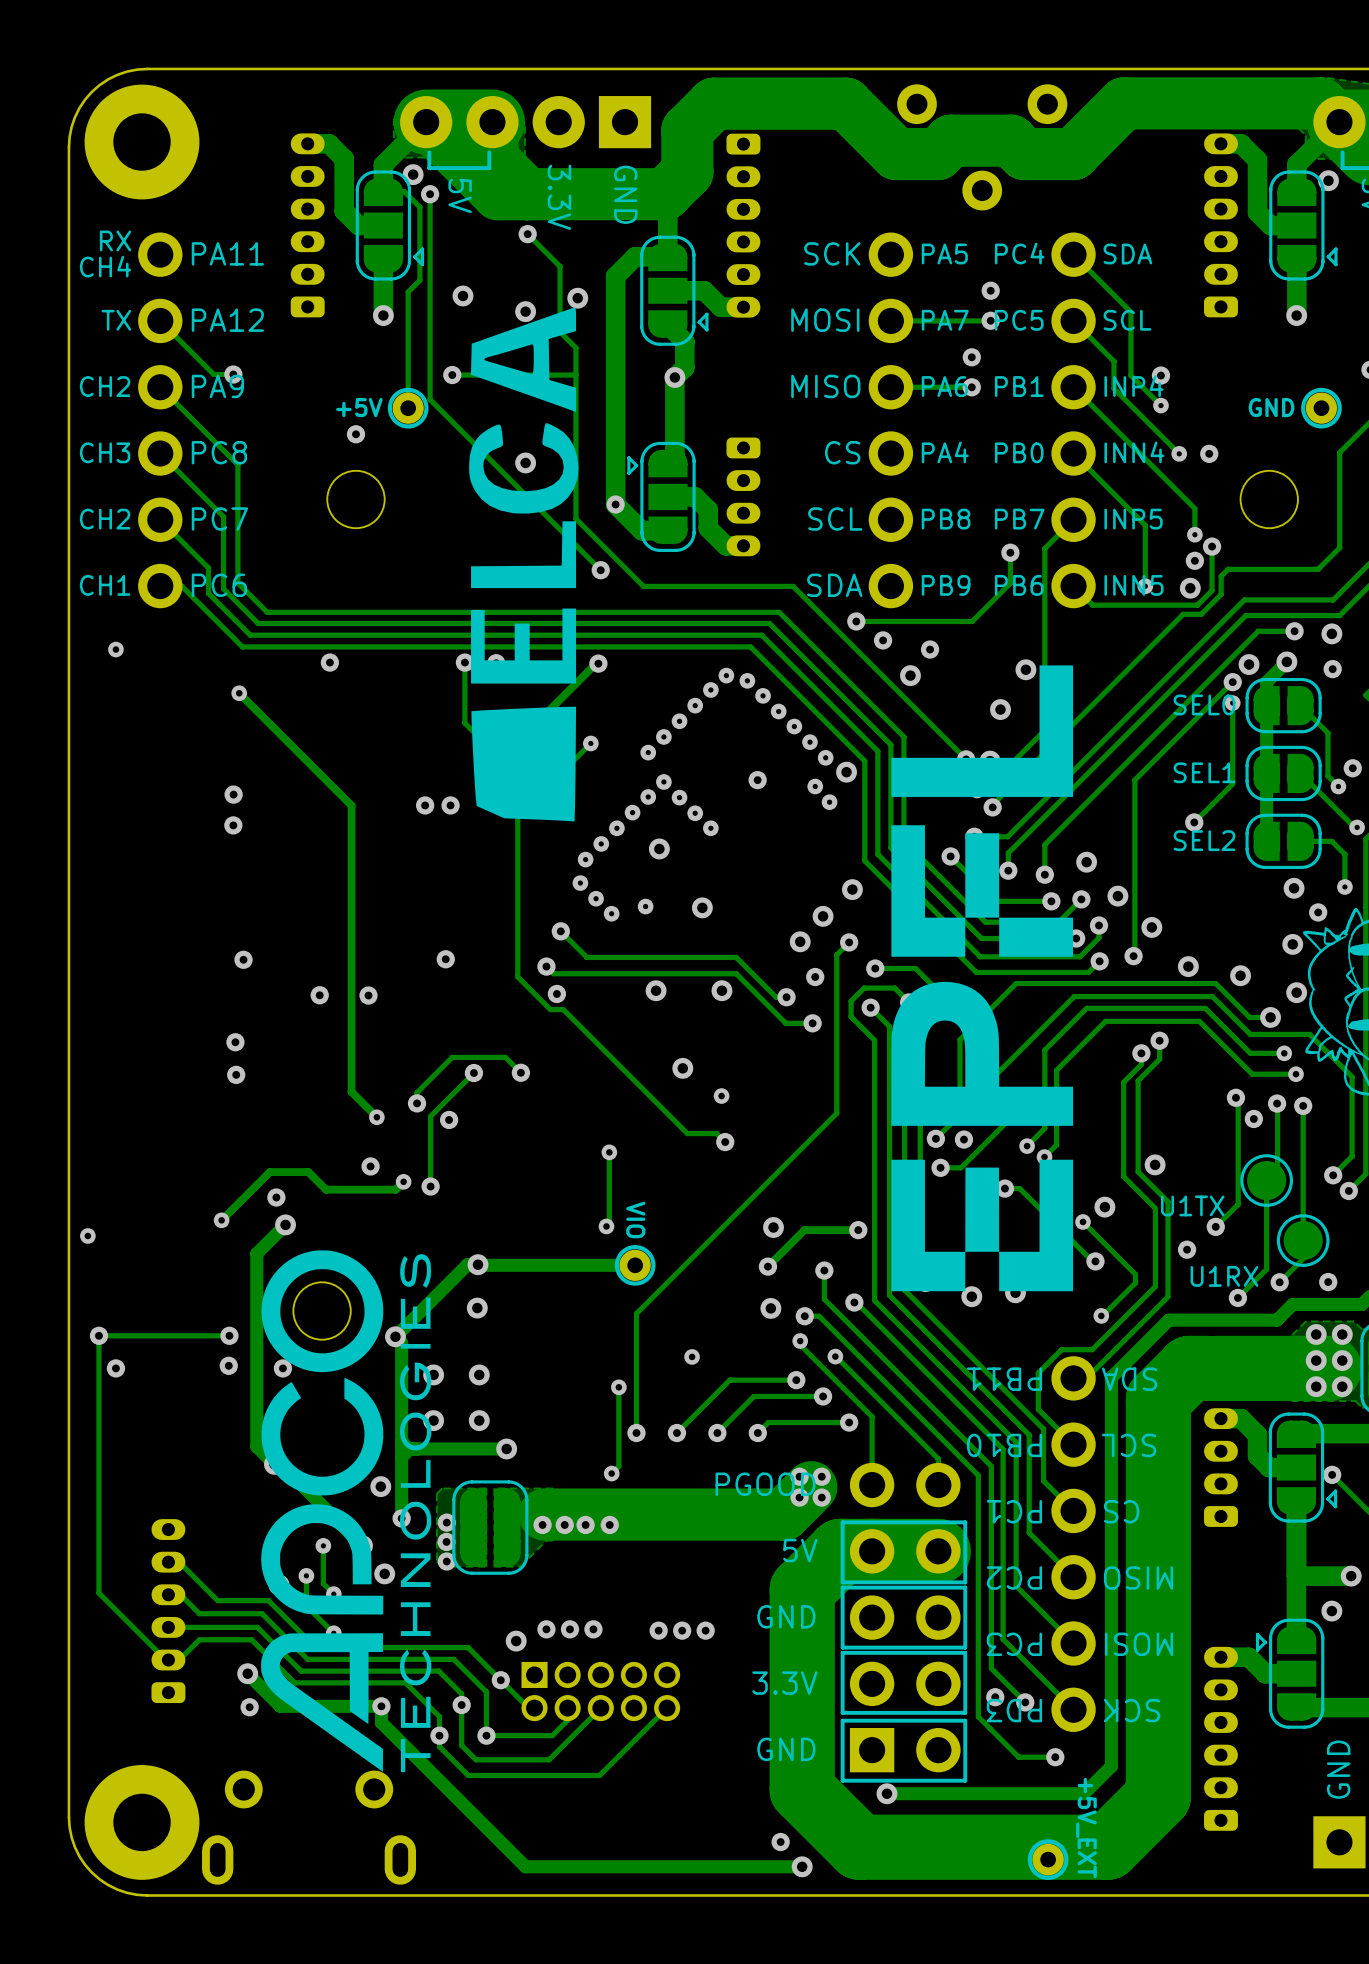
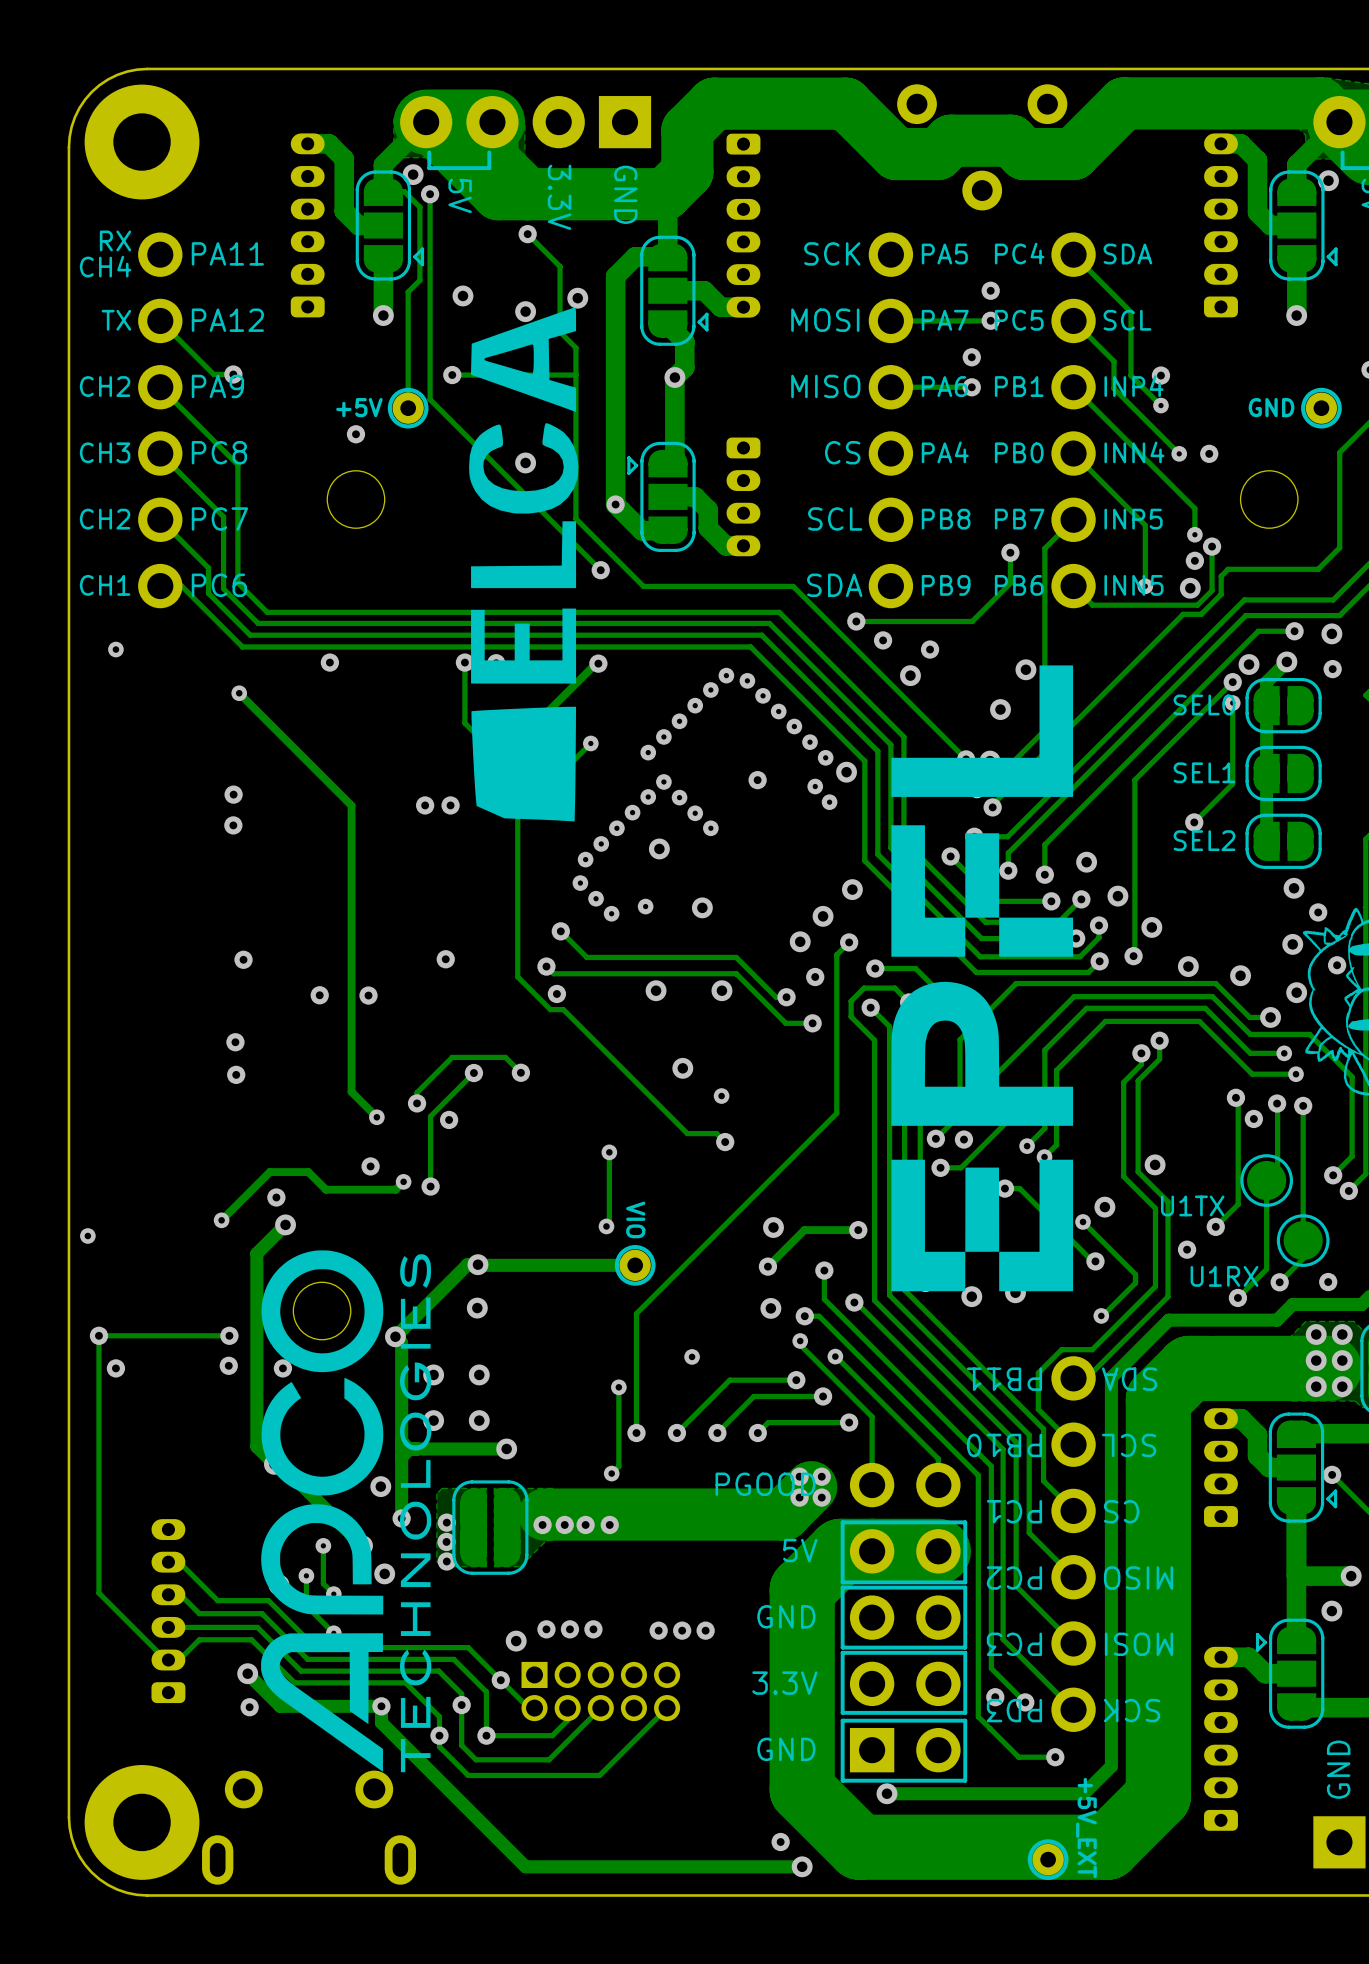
track: (1300, 705) (1327, 733) (1327, 776) (1338, 786) -> none
via: (1352, 768) -> none
track: (1300, 773) (1354, 827) (1357, 827) -> none
via: (1338, 786) -> none
via: (1357, 827) -> none
track: (1300, 841) (1331, 841) (1344, 854) (1344, 886) -> none
via: (1344, 886) -> none
via: none -> (1337, 965)

